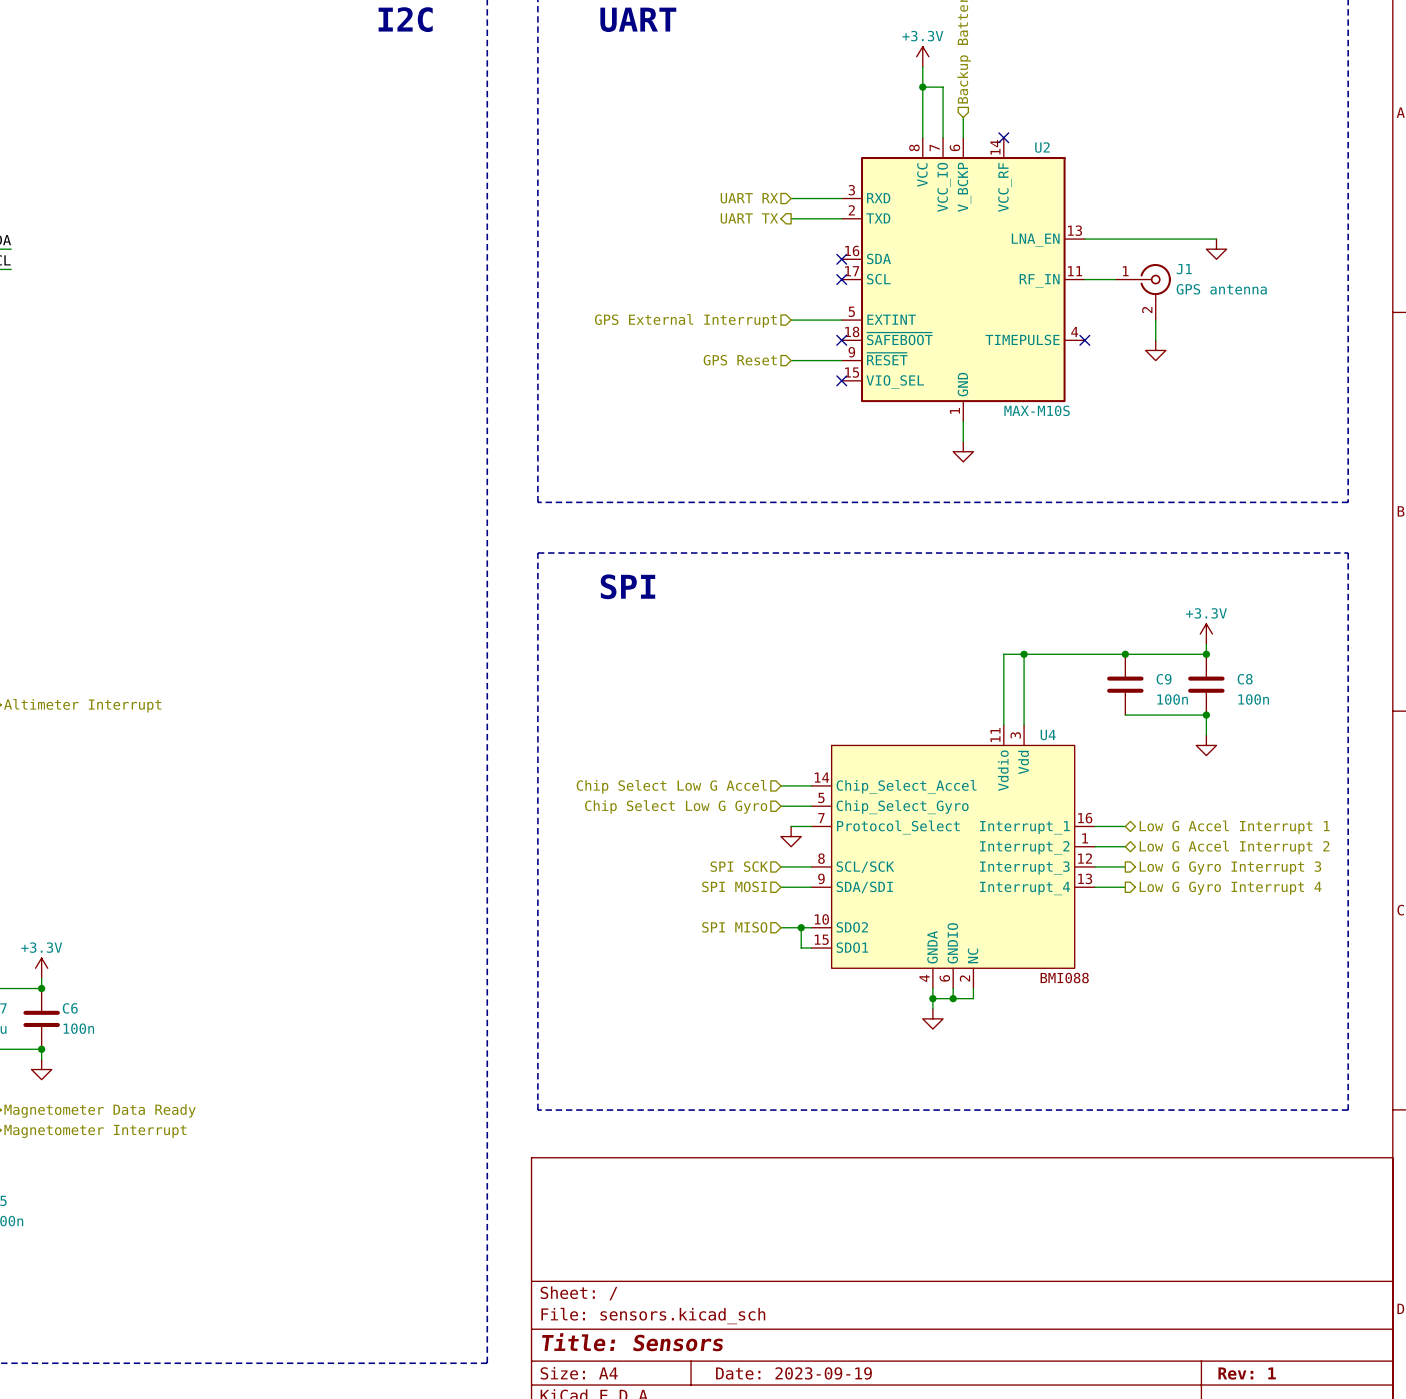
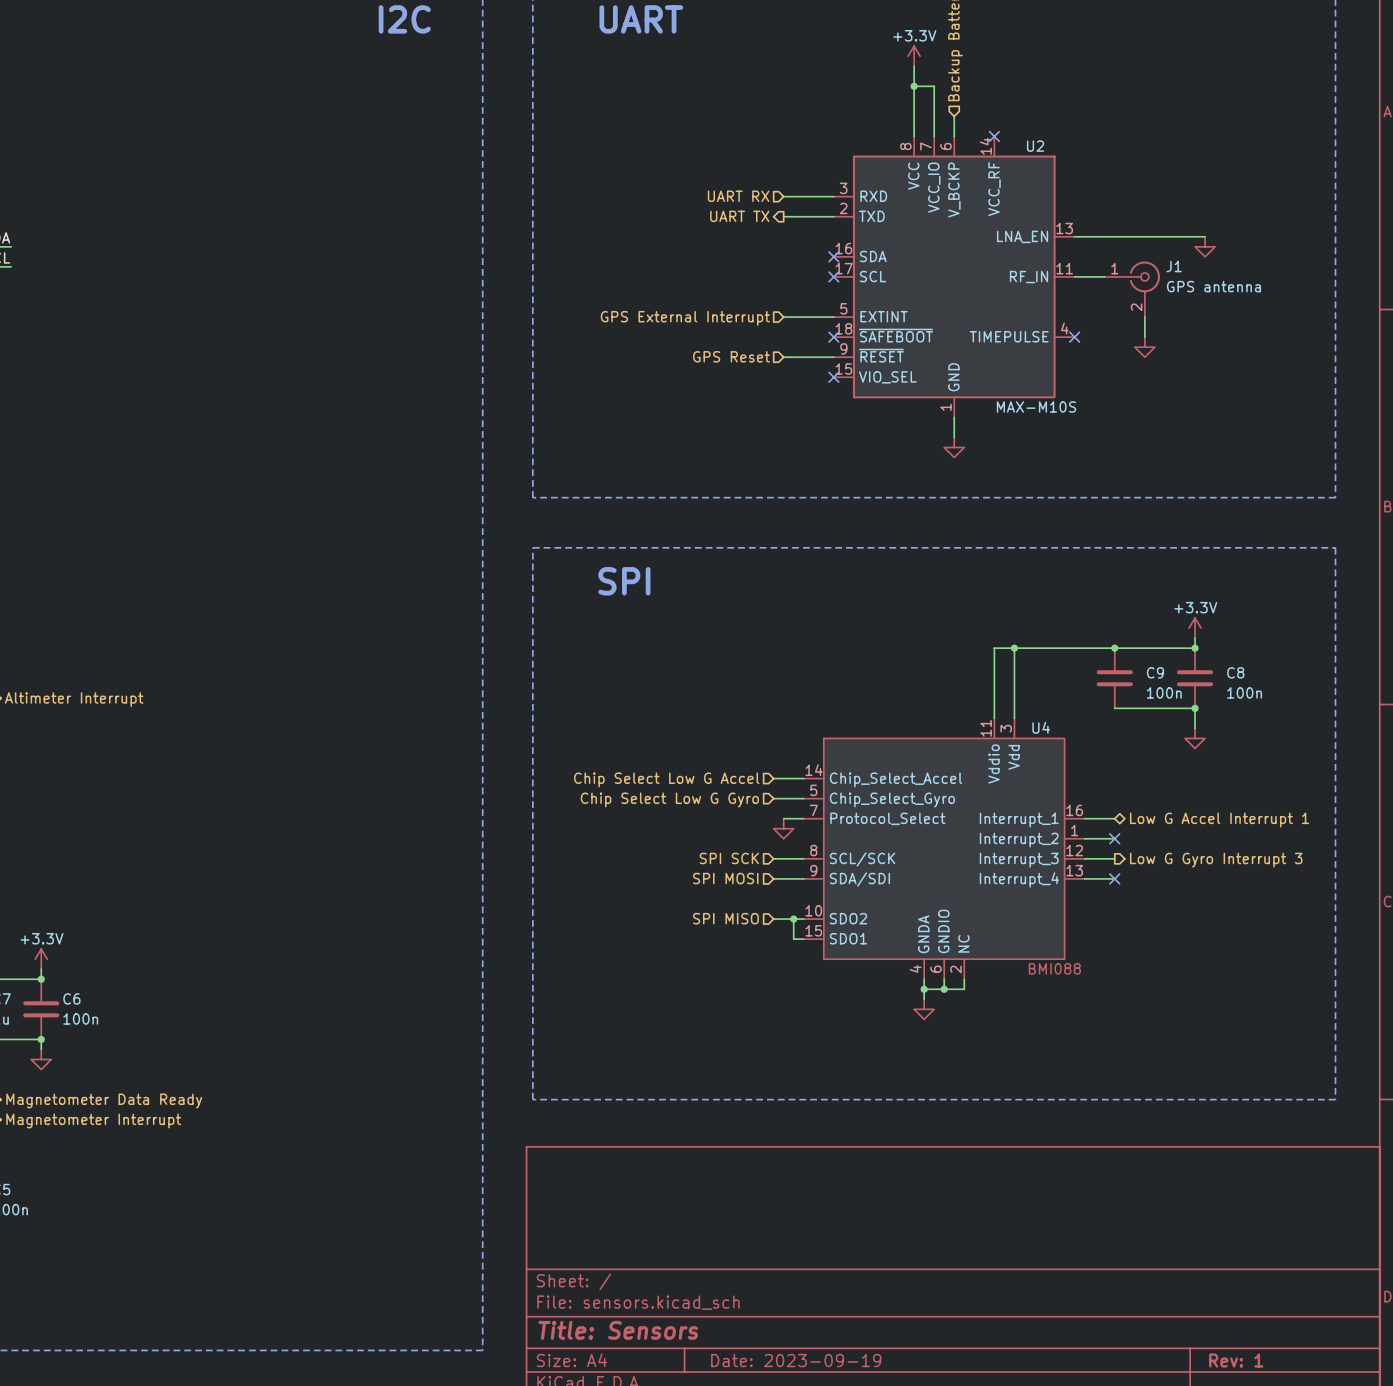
no-connect mark: none -> (1114, 838)
hierarchical label: Low G Accel Interrupt 2 (1234, 847) -> none
no-connect mark: none -> (1114, 878)
hierarchical label: Low G Gyro Interrupt 4 (1230, 888) -> none

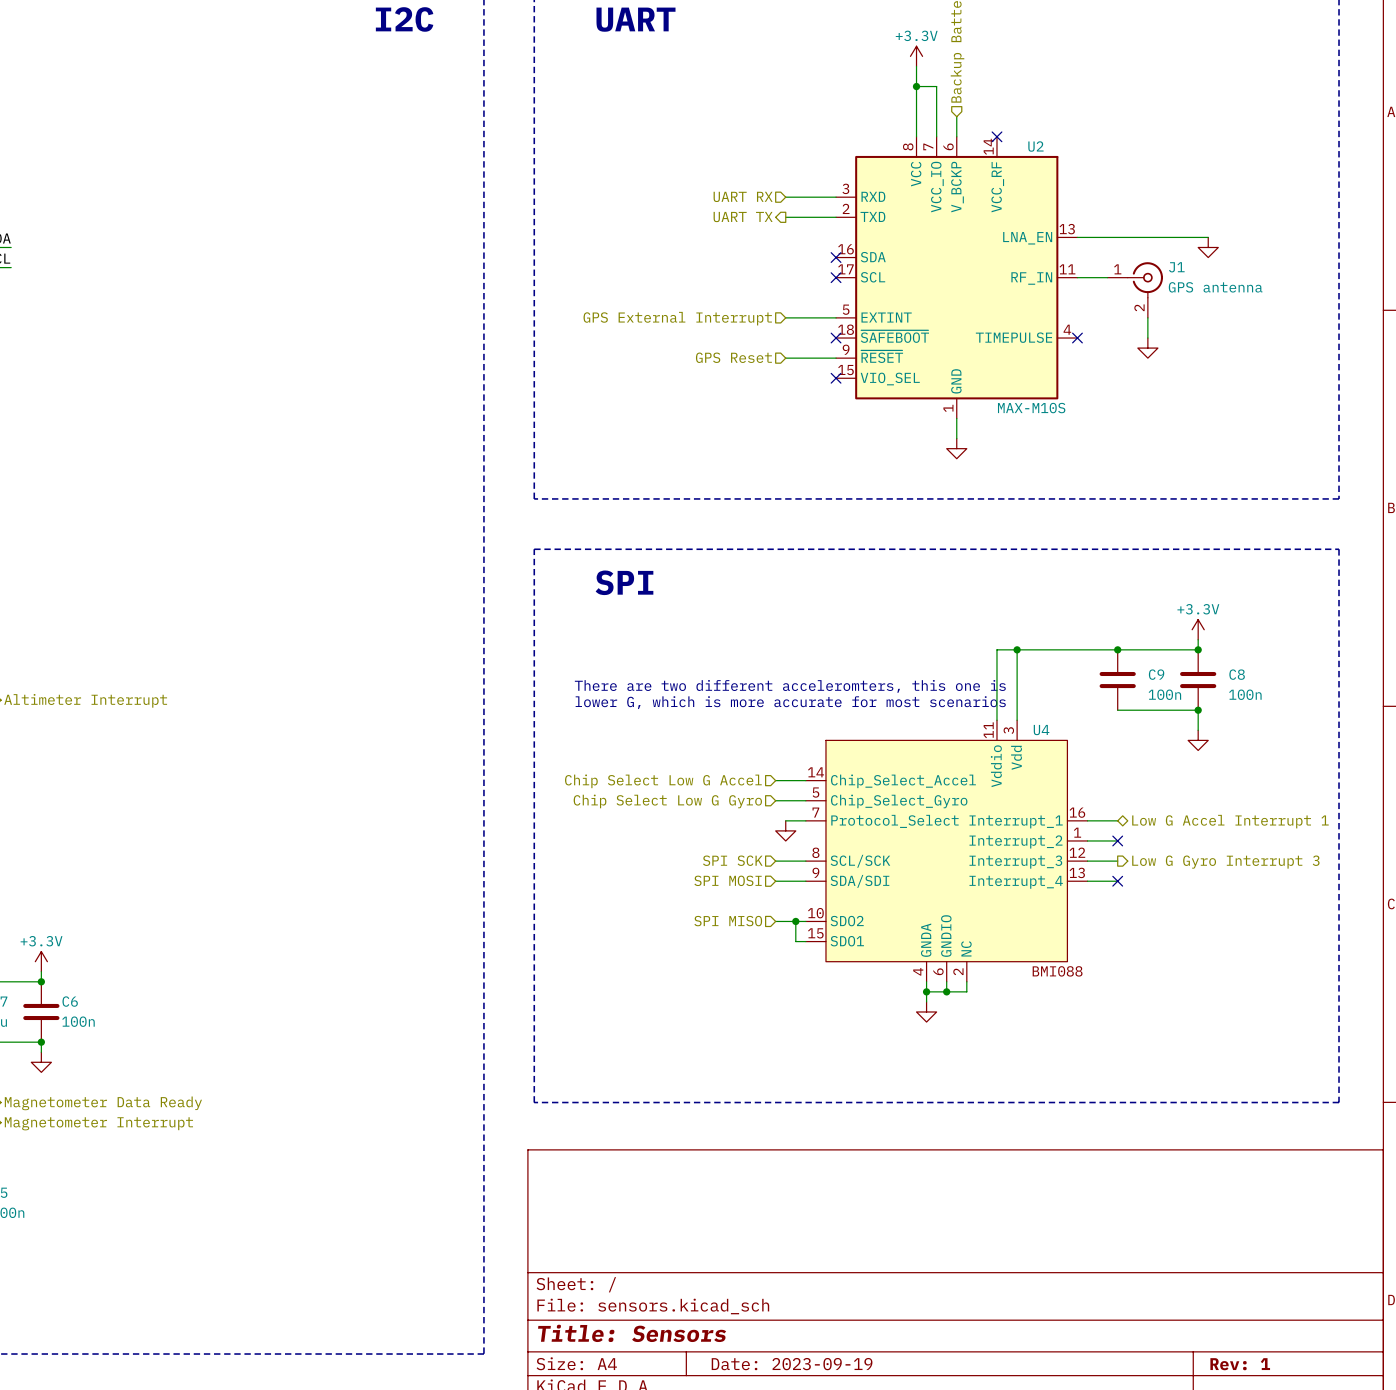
text: none -> There are two different acceleromters, this one is (790, 686)
text: none -> lower G, which is more accurate for most scenarios (790, 702)

